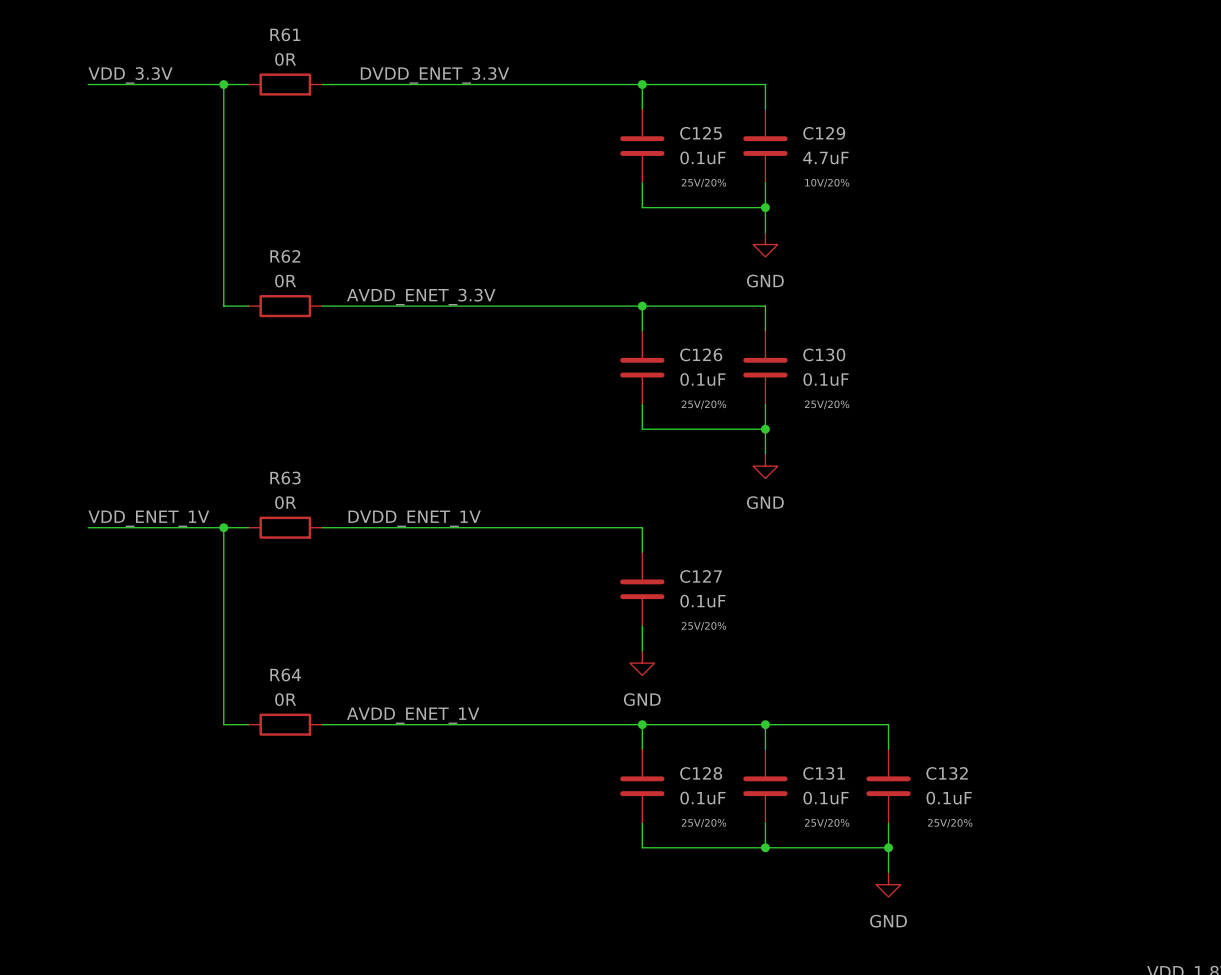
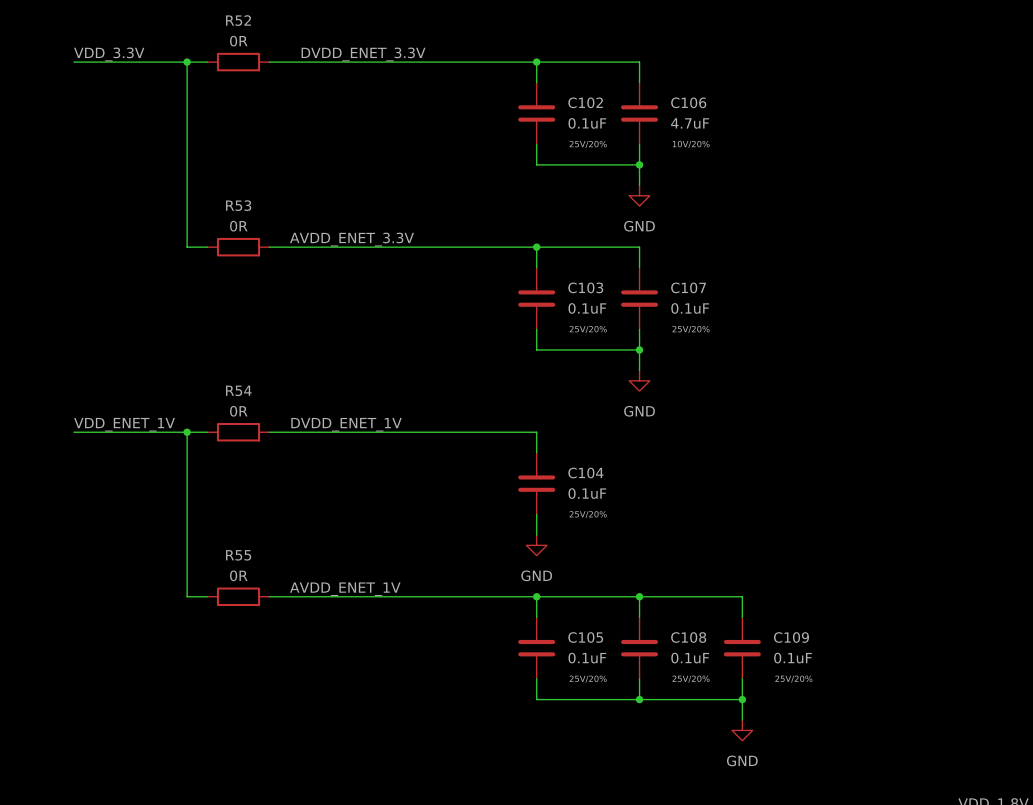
R61 name: R61 (285, 34) -> R52 (238, 20)
C125 name: C125 (700, 133) -> C102 (585, 102)
C129 name: C129 (824, 133) -> C106 (688, 102)
R62 name: R62 (285, 256) -> R53 (238, 205)
C126 name: C126 (701, 354) -> C103 (585, 287)
C130 name: C130 (824, 354) -> C107 (688, 287)
R63 name: R63 (285, 478) -> R54 (238, 390)
C127 name: C127 (701, 576) -> C104 (585, 472)
R64 name: R64 (285, 674) -> R55 (238, 555)
C128 name: C128 (701, 773) -> C105 (585, 637)
C131 name: C131 (824, 773) -> C108 (688, 637)
C132 name: C132 (947, 773) -> C109 (791, 637)

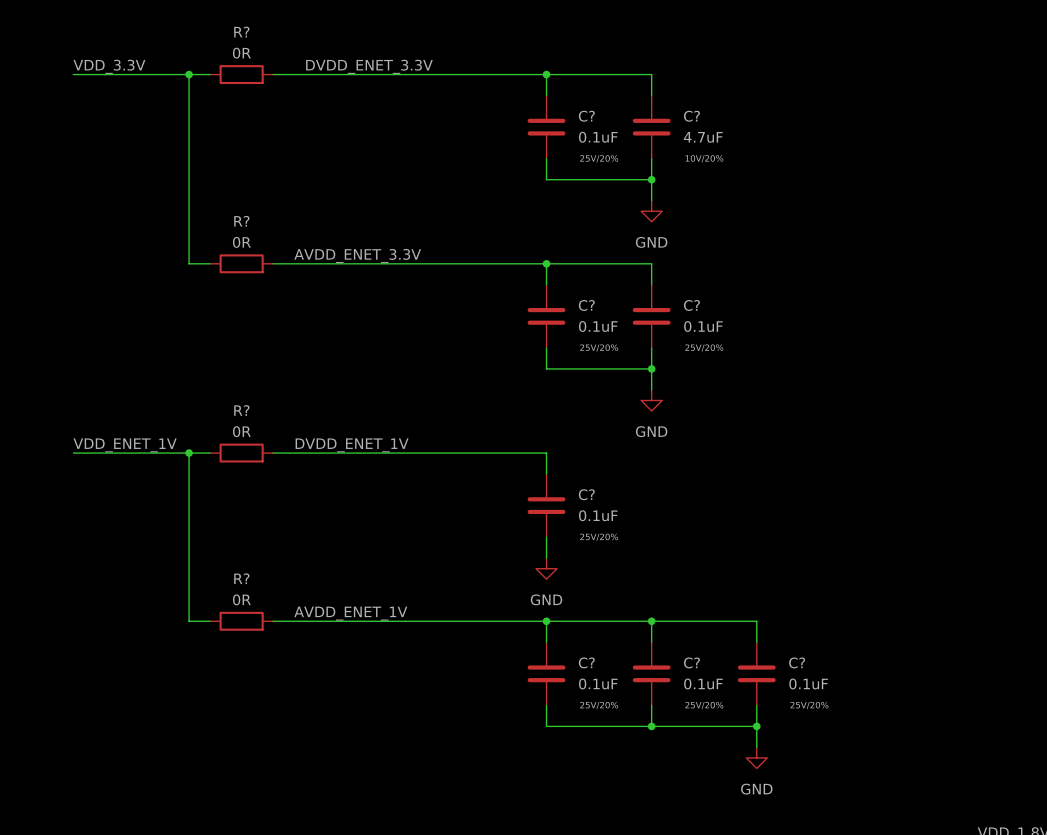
R52 name: R52 (238, 20) -> R? (241, 32)
C102 name: C102 (585, 102) -> C? (586, 116)
C106 name: C106 (688, 102) -> C? (691, 116)
R53 name: R53 (238, 205) -> R? (241, 221)
C103 name: C103 (585, 287) -> C? (586, 305)
C107 name: C107 (688, 287) -> C? (691, 305)
R54 name: R54 (238, 390) -> R? (241, 410)
C104 name: C104 (585, 472) -> C? (586, 494)
R55 name: R55 (238, 555) -> R? (241, 578)
C105 name: C105 (585, 637) -> C? (586, 662)
C108 name: C108 (688, 637) -> C? (691, 662)
C109 name: C109 (791, 637) -> C? (797, 662)

